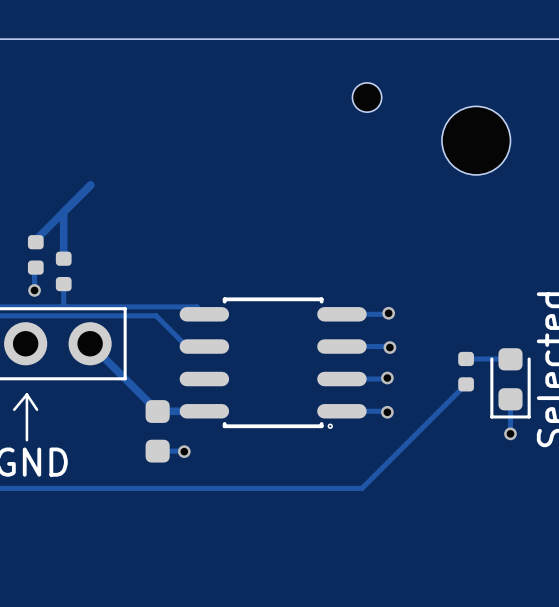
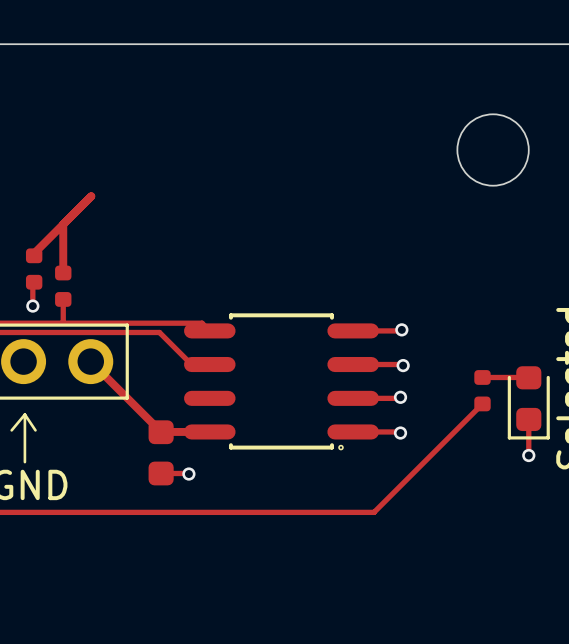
part: (367, 97) -> none

